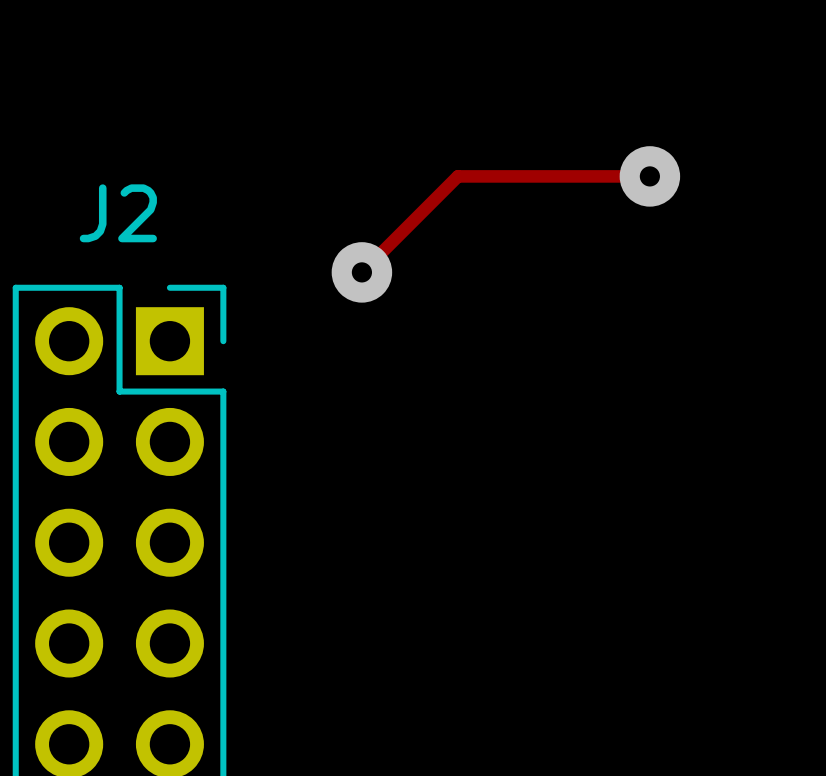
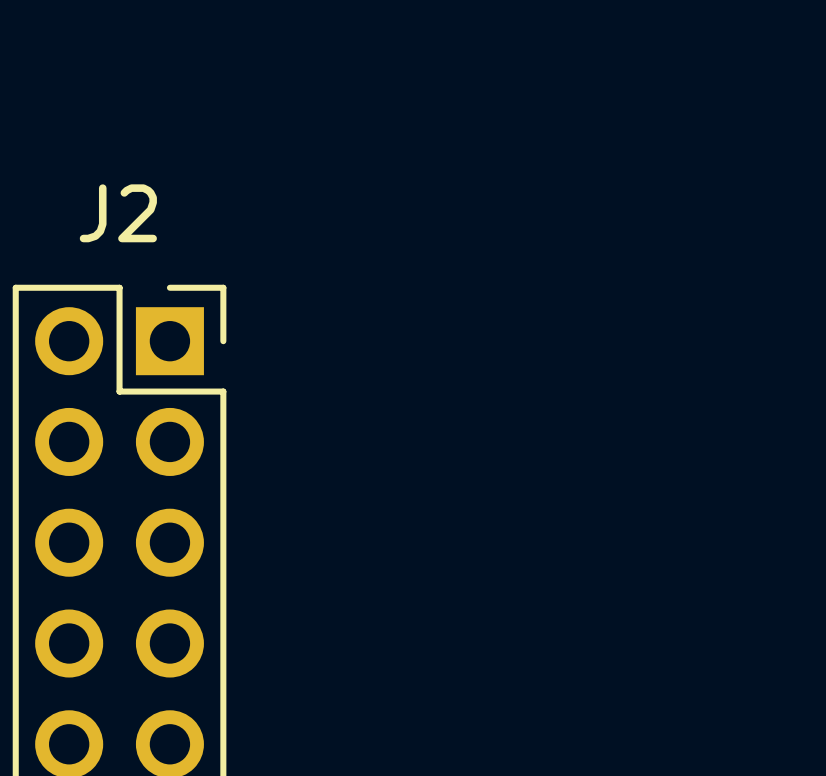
track: (649, 176) (457, 176) (361, 272) -> none
via: (649, 176) -> none
via: (361, 272) -> none

